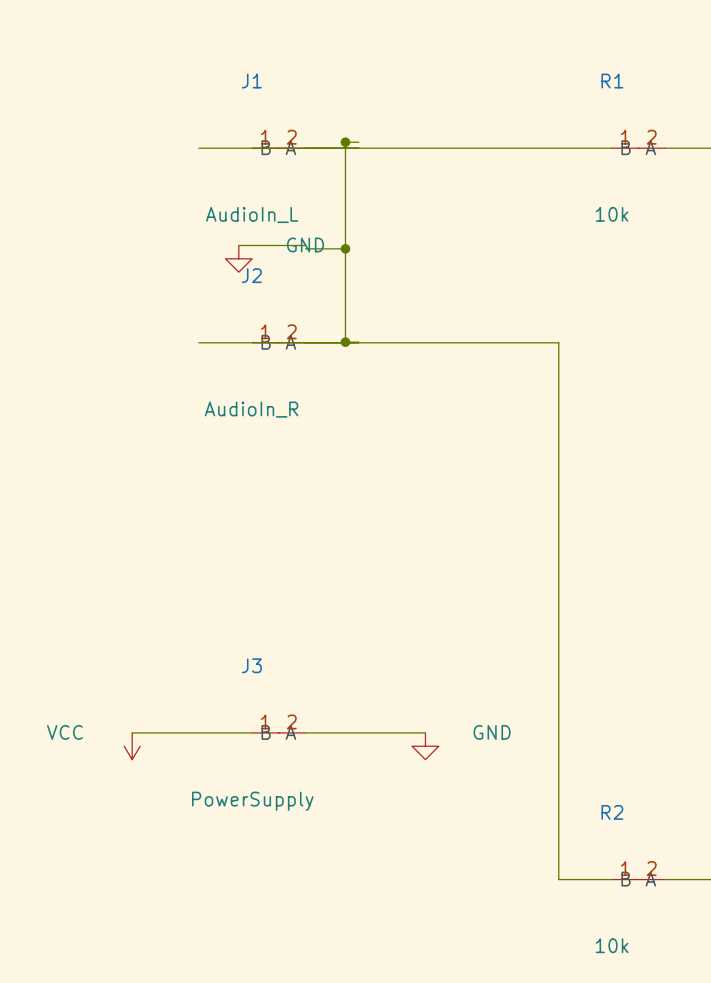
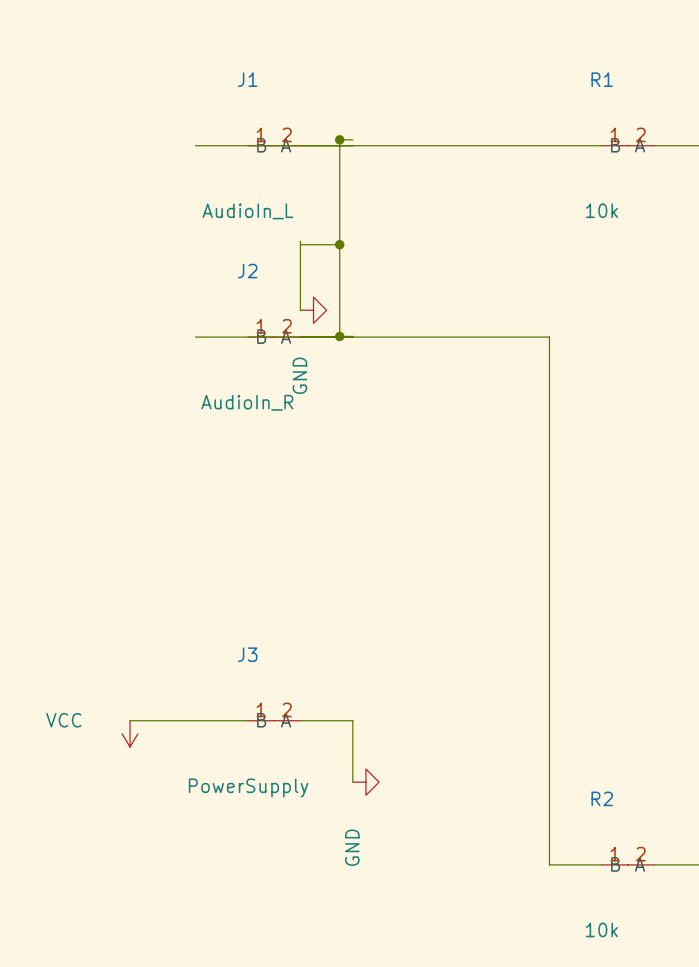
power symbol text position: GND (305, 244) -> GND (299, 375)
wire: (238, 245) (305, 245) -> (300, 310) (300, 241)
power symbol rotation: 0° (238, 258) -> 90° counterclockwise (313, 310)
power symbol position: GND (238, 258) -> GND (313, 310)
wire: (358, 732) (425, 732) -> (352, 720) (352, 782)
power symbol text position: GND (492, 732) -> GND (352, 847)
power symbol rotation: 0° (425, 746) -> 90° counterclockwise (365, 782)
power symbol position: GND (425, 746) -> GND (365, 782)

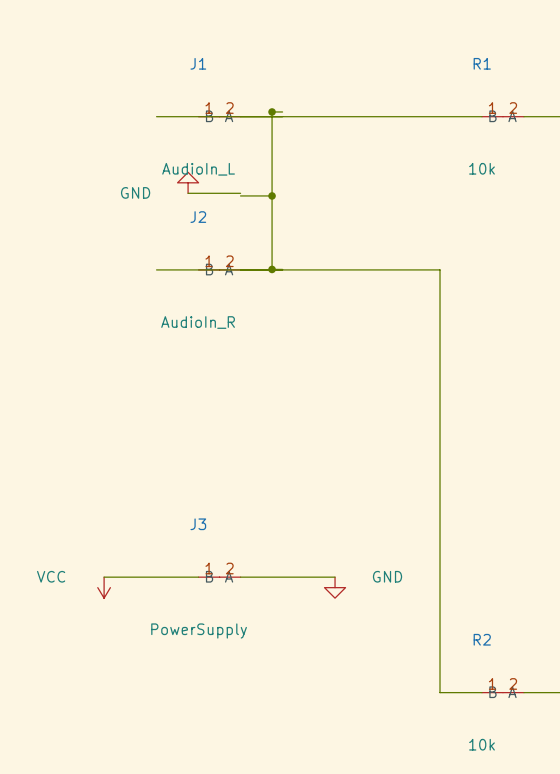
wire: (300, 241) (300, 310) -> (240, 193) (188, 193)
power symbol rotation: 0° (313, 310) -> 90° counterclockwise (188, 182)
power symbol position: GND (313, 310) -> GND (188, 182)
power symbol text position: GND (299, 375) -> GND (135, 192)
wire: (352, 720) (352, 782) -> (282, 577) (335, 577)
power symbol rotation: 0° (365, 782) -> 90° clockwise (335, 587)
power symbol position: GND (365, 782) -> GND (335, 587)
power symbol text position: GND (352, 847) -> GND (387, 576)

